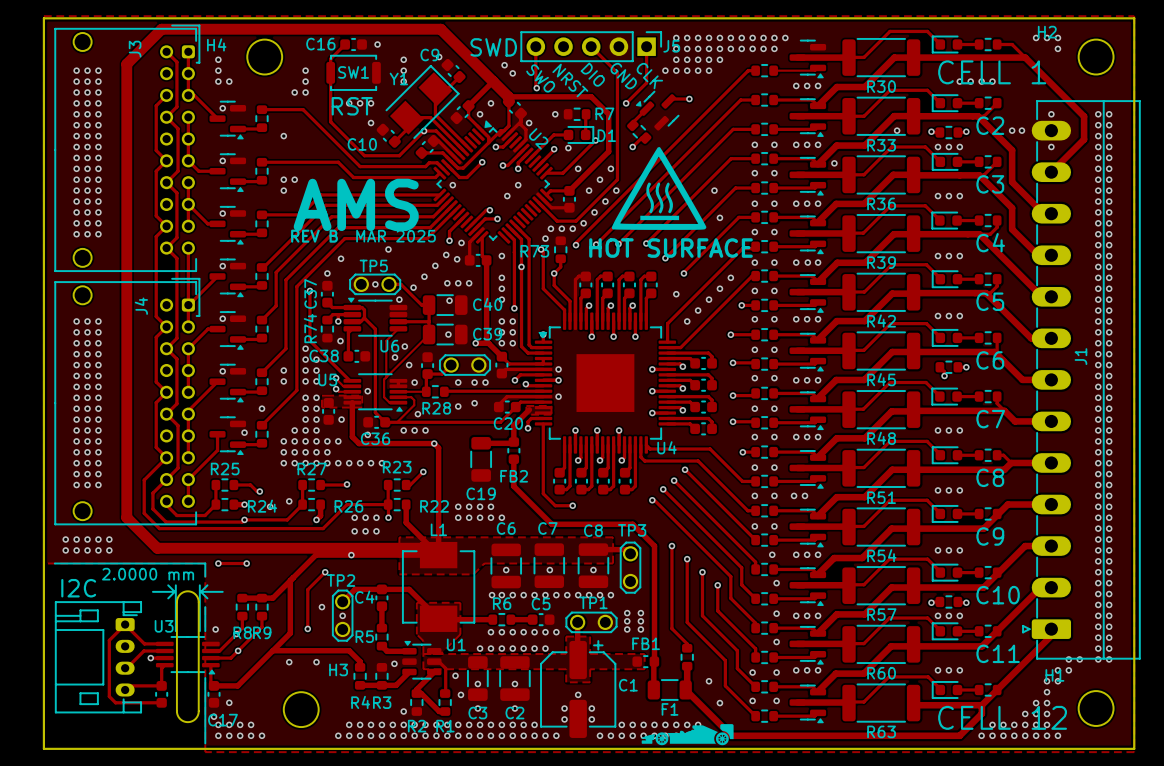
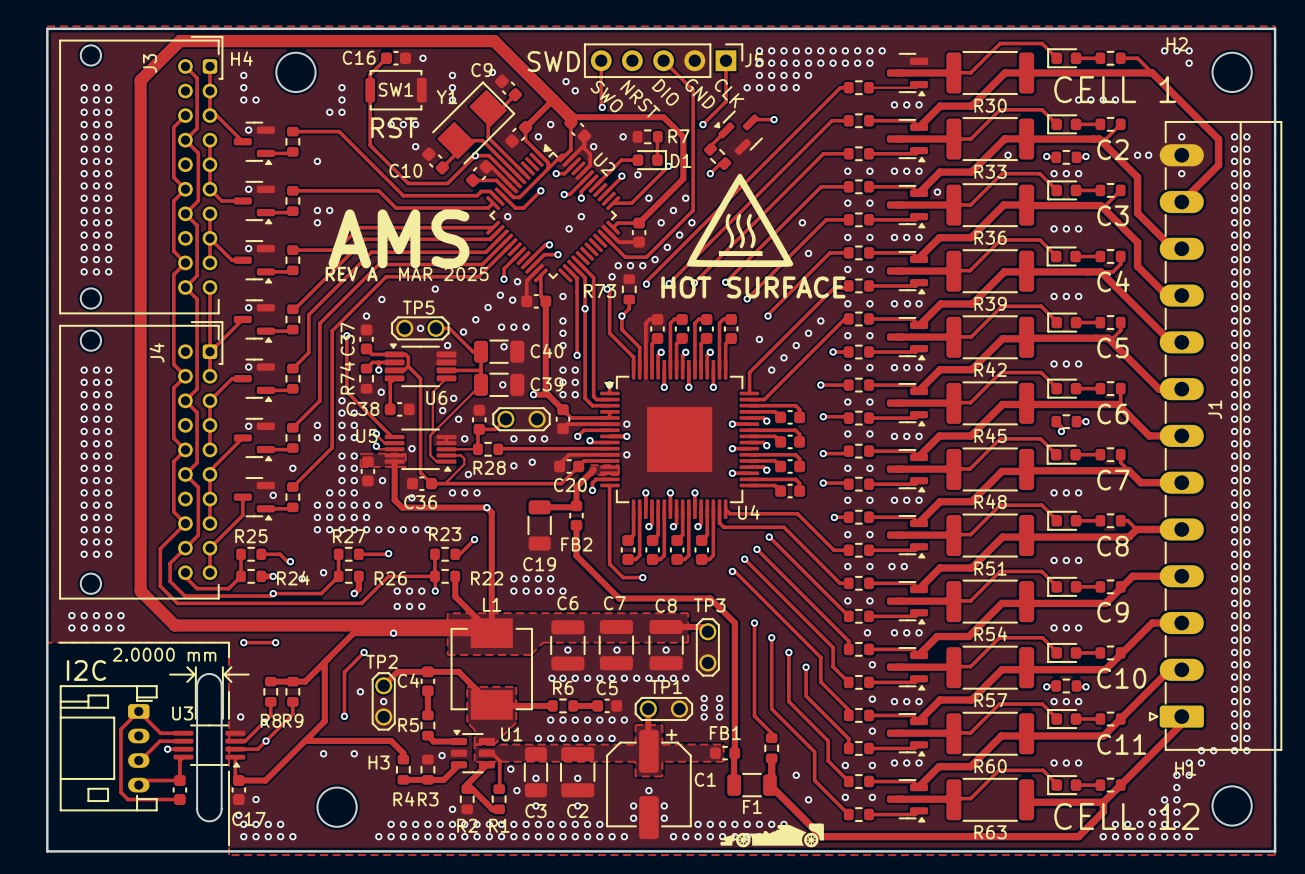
text: REV B (314, 236) -> REV A (351, 274)

